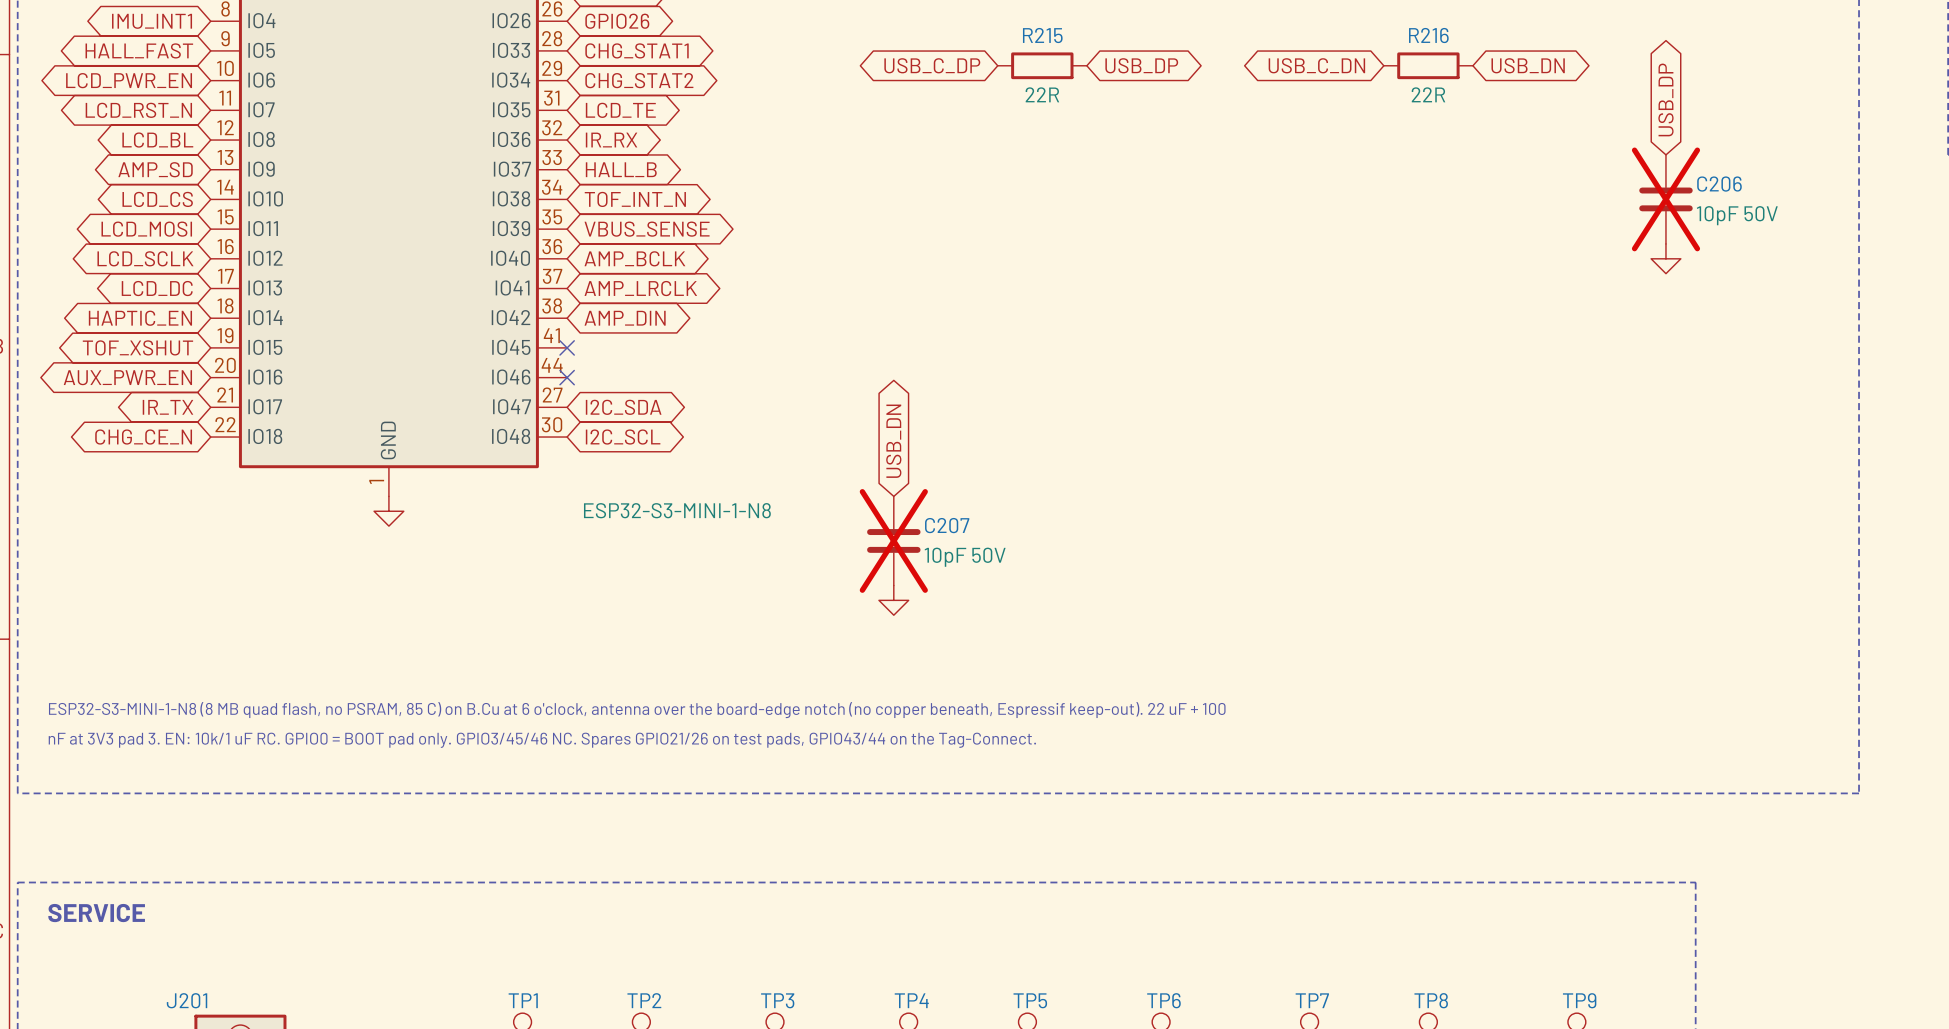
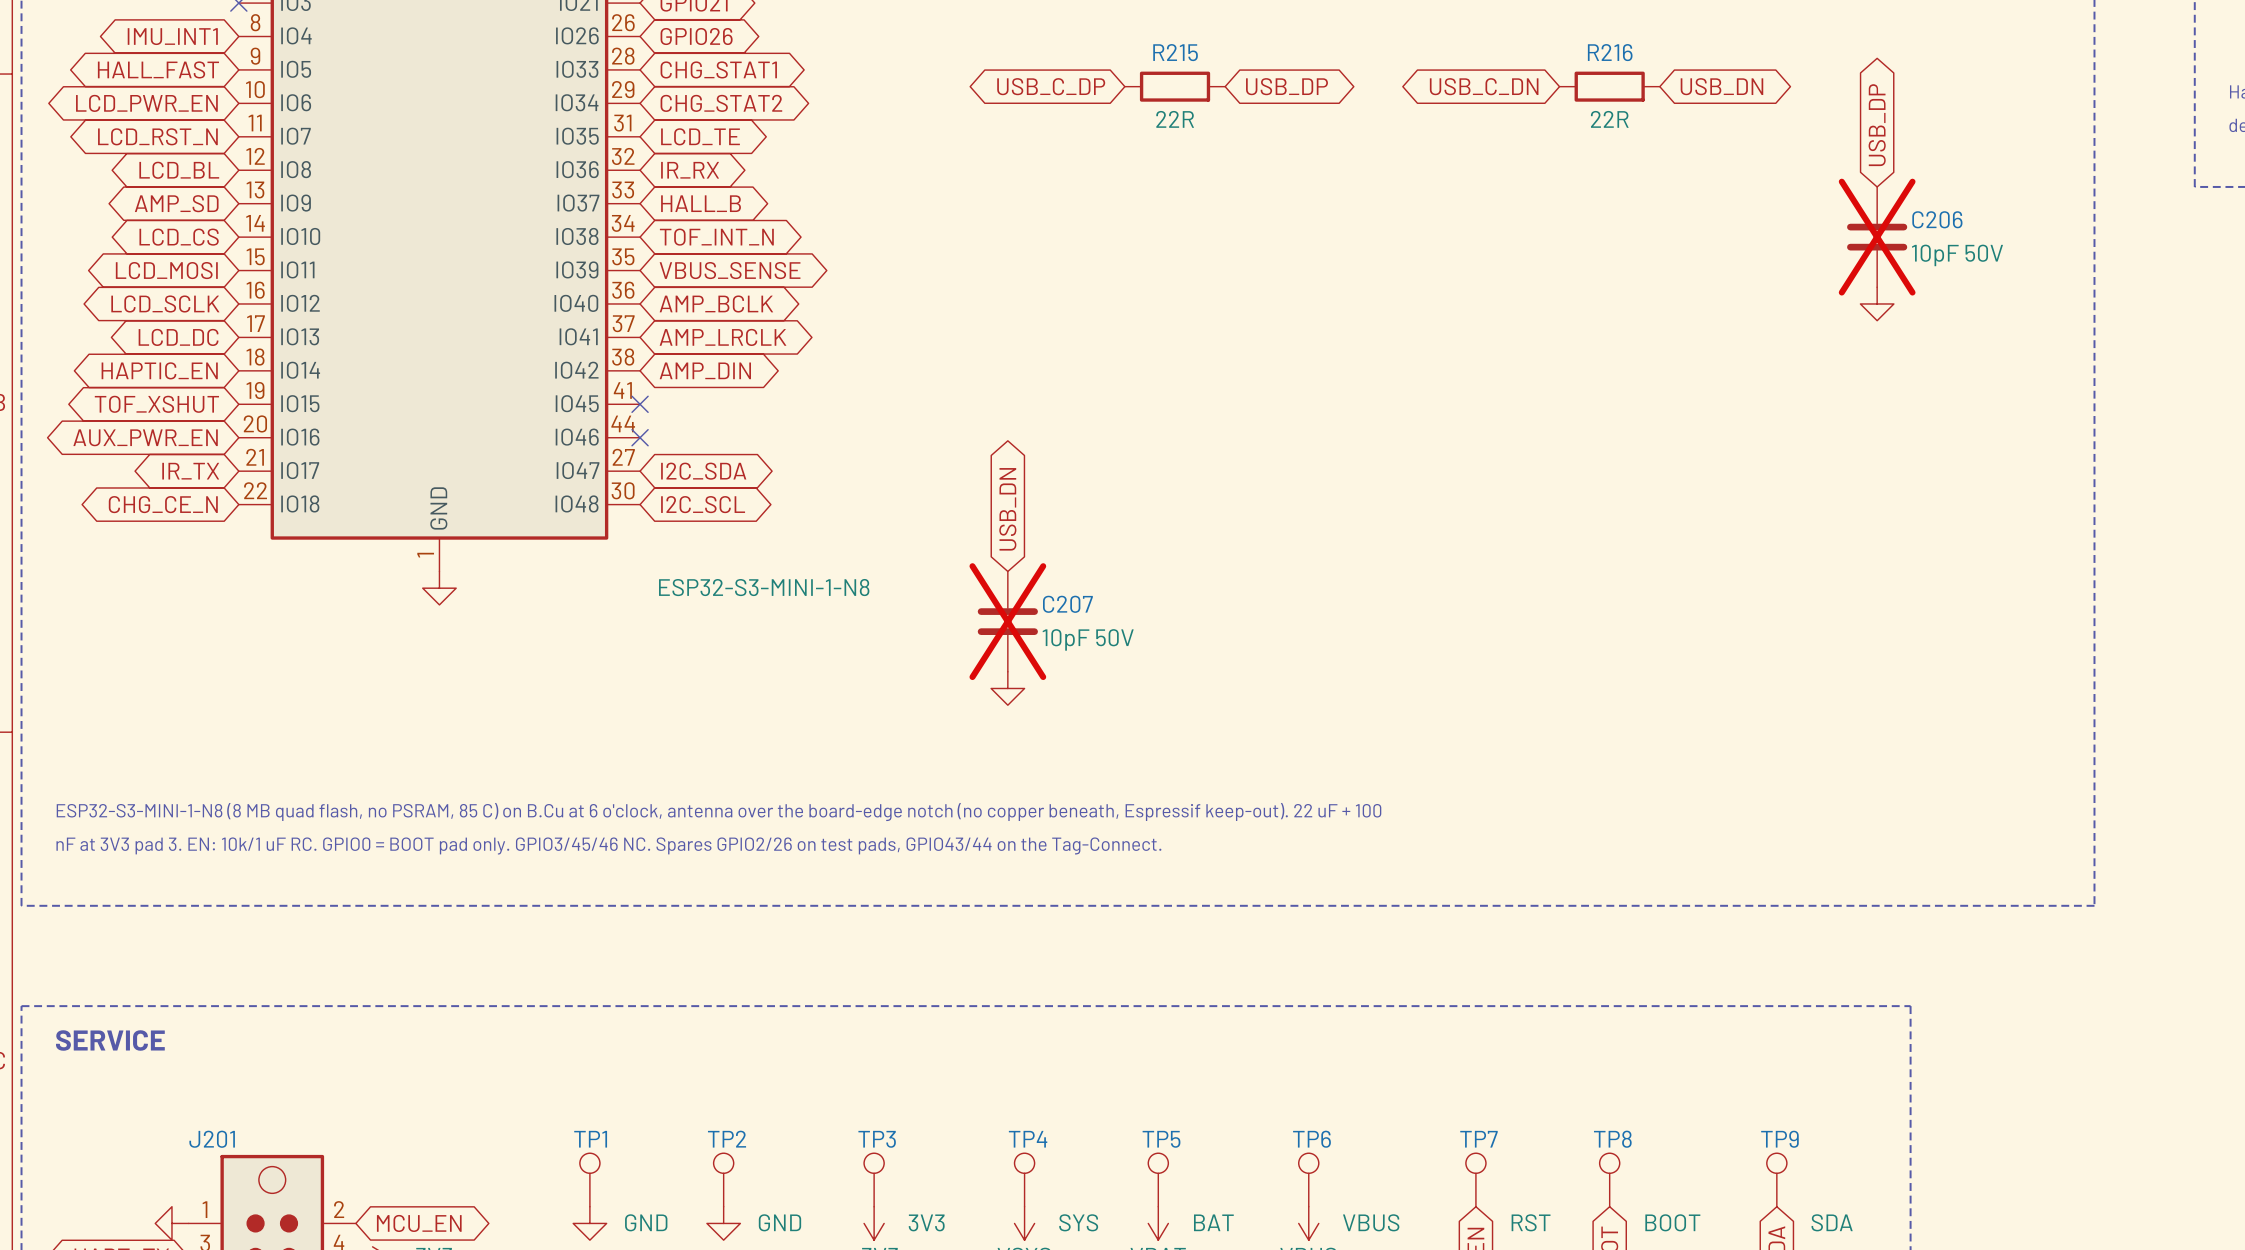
text: nF at 3V3 pad 3. EN: 10k/1 uF RC. GPIO0 = BOOT pad only. GPIO3/45/46 NC. Spares GPIO21/26 on test pads, GPIO43/44 on the Tag-Connect. (542, 740) -> nF at 3V3 pad 3. EN: 10k/1 uF RC. GPIO0 = BOOT pad only. GPIO3/45/46 NC. Spares GPIO2/26 on test pads, GPIO43/44 on the Tag-Connect. (608, 845)

